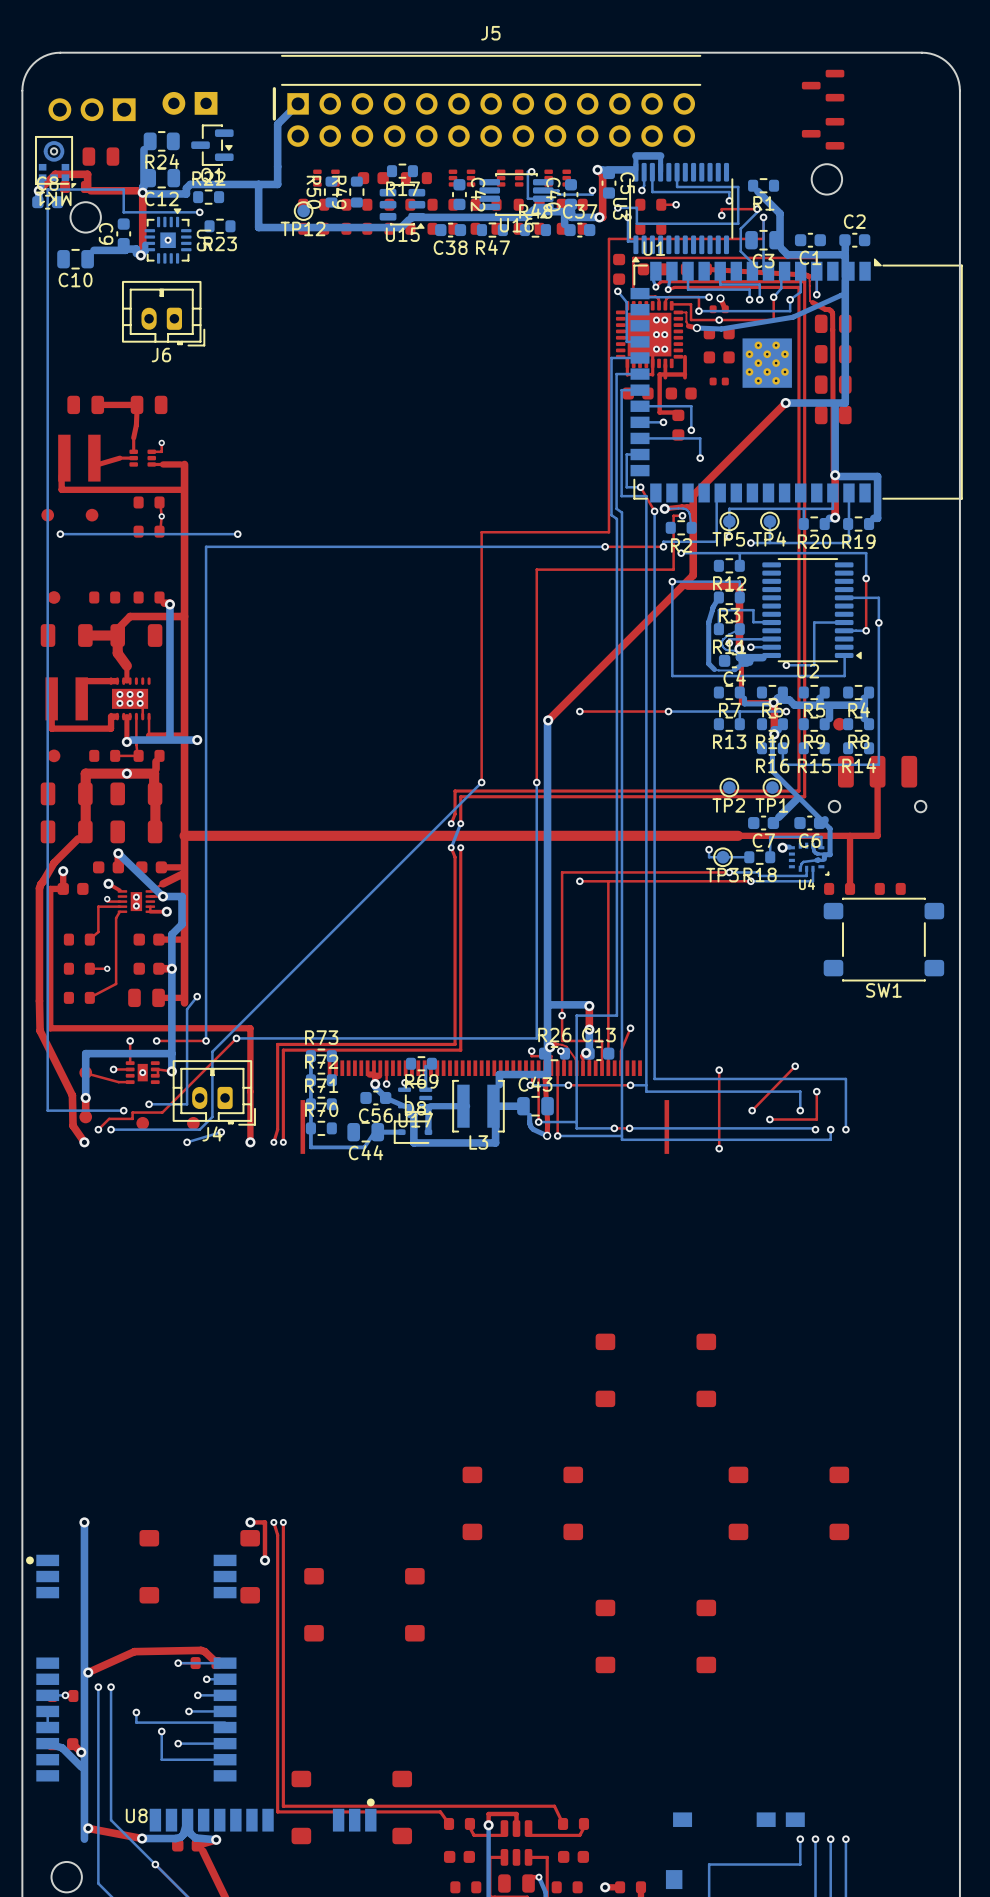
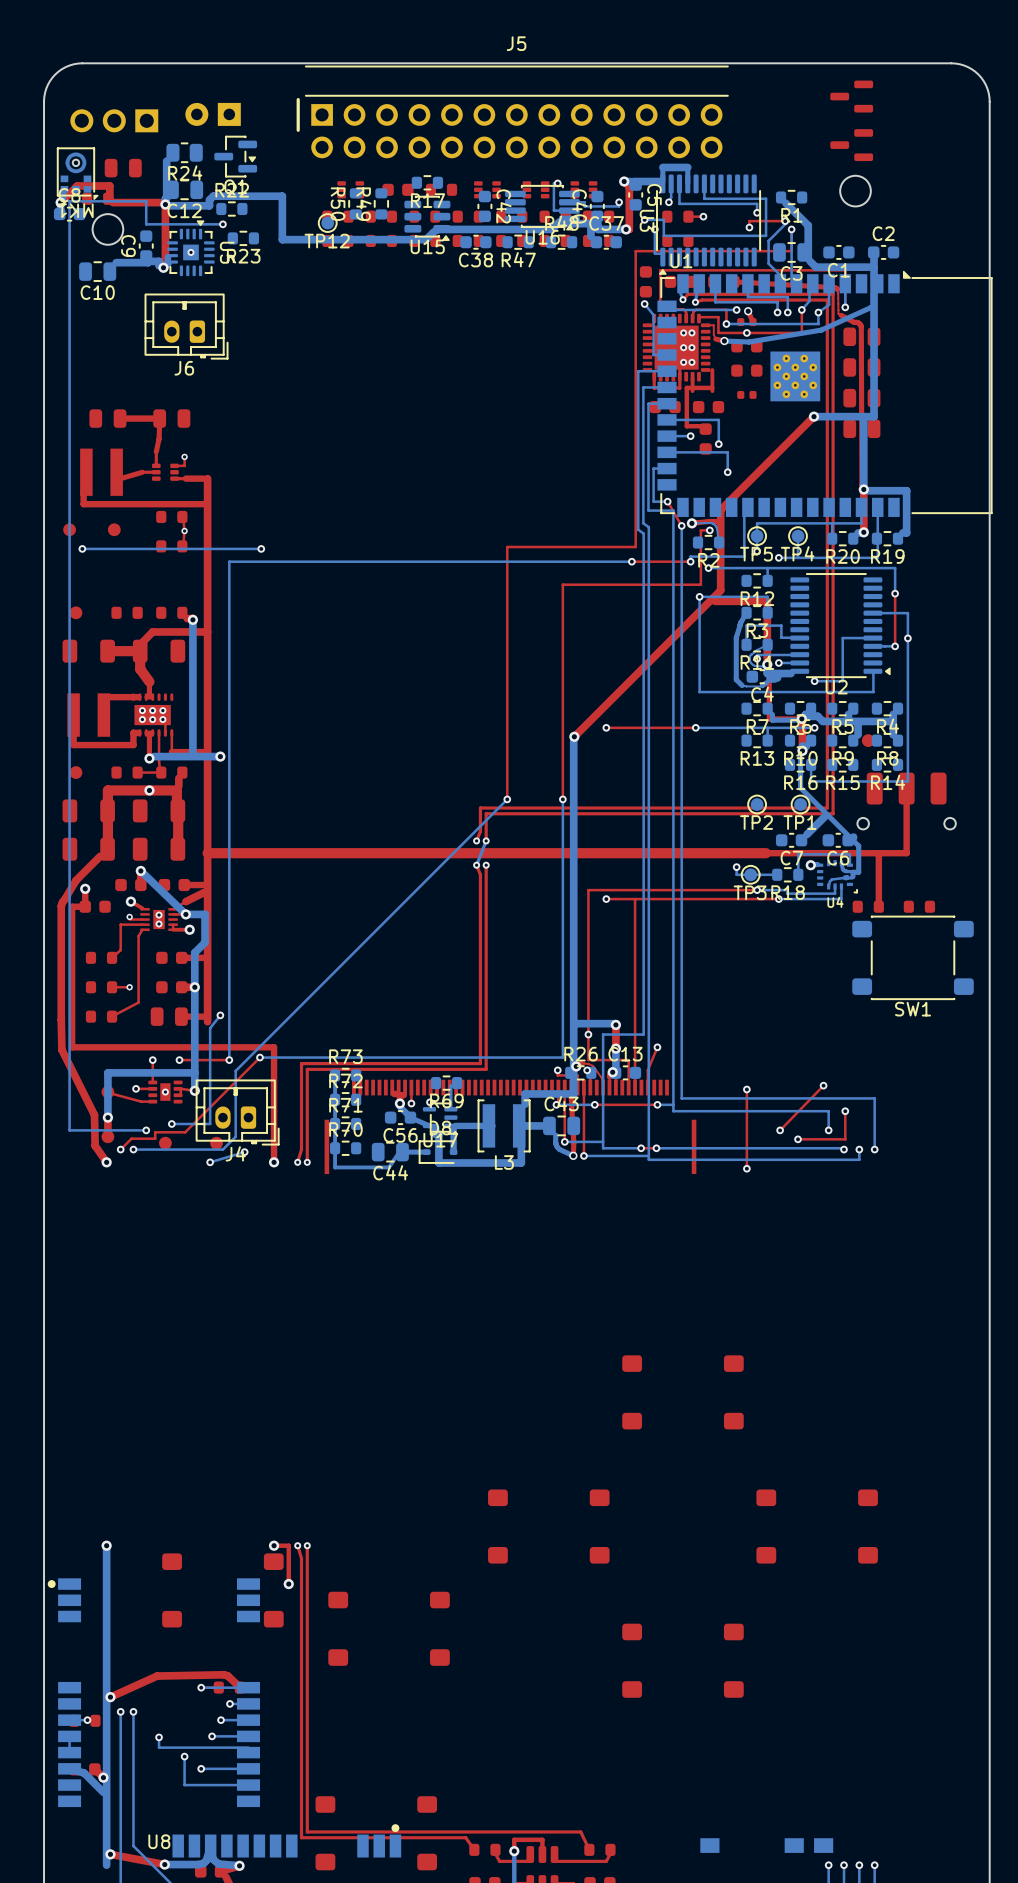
bottom track: (298, 103) (277, 124) (277, 184) (258, 184) -> none

